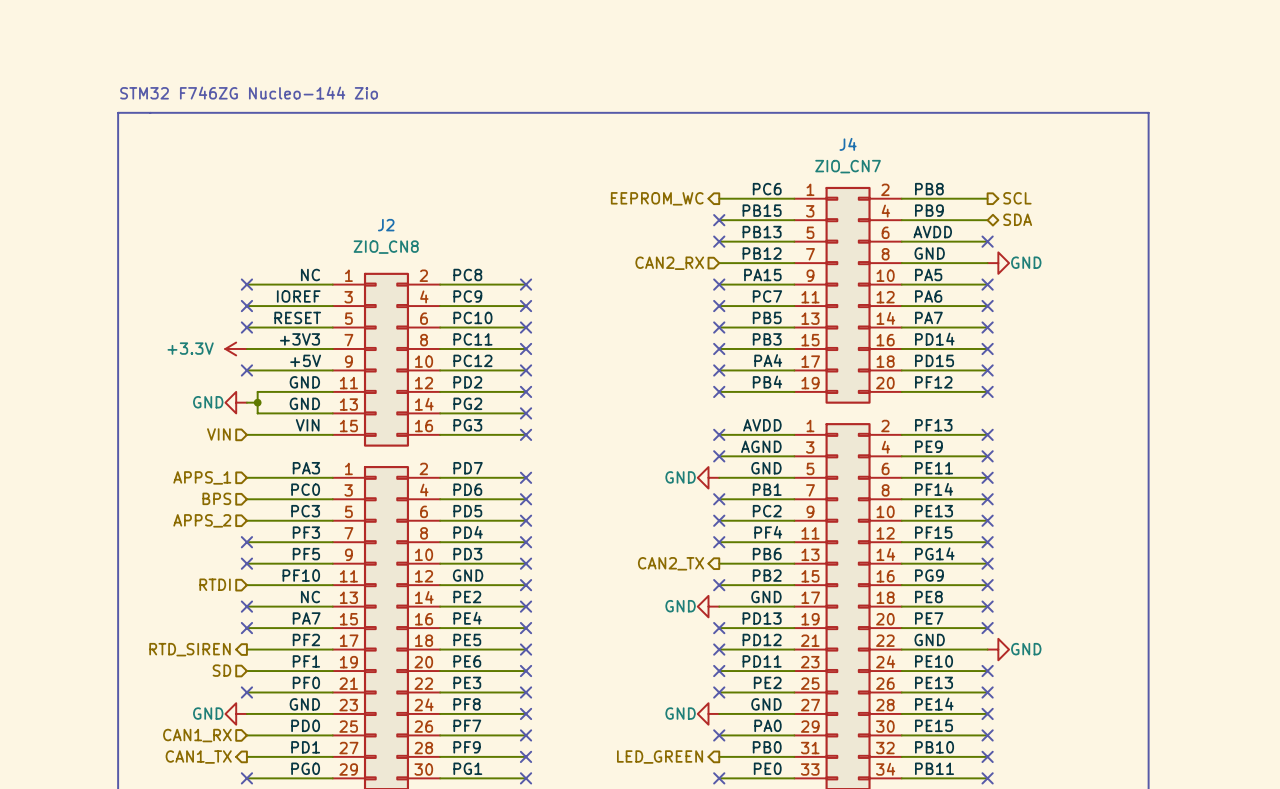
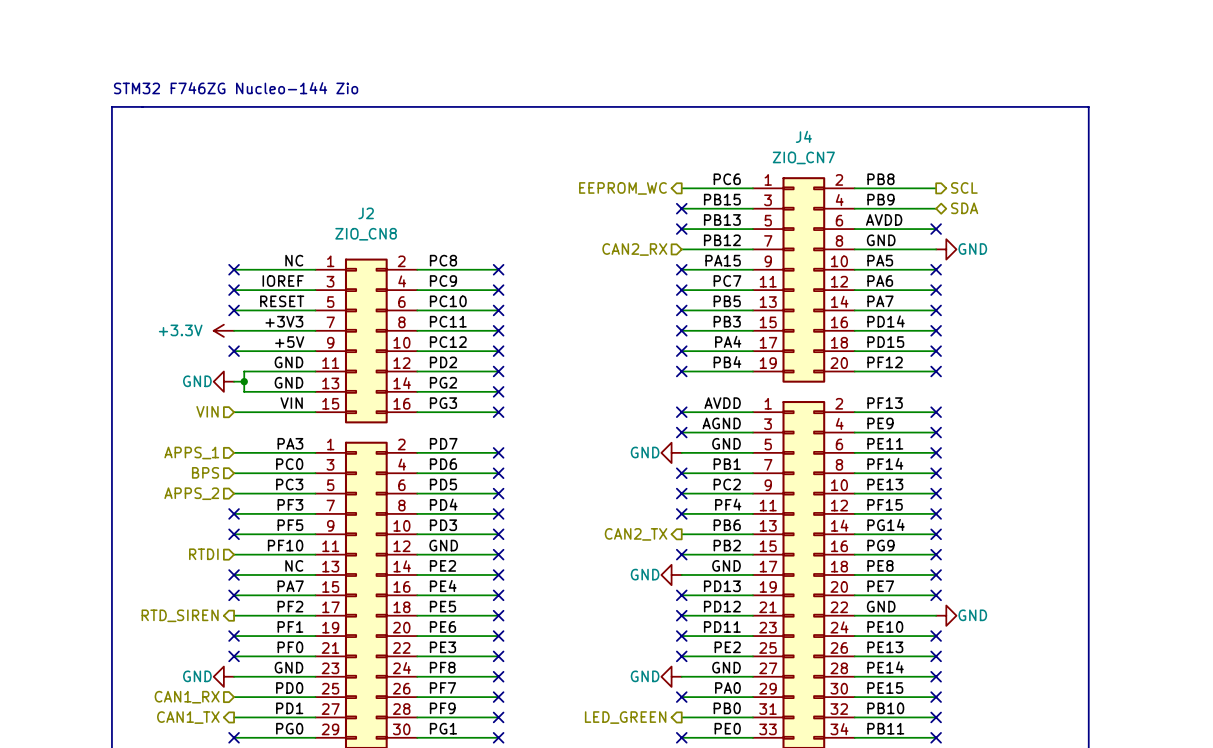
hierarchical label: SD (221, 670) -> none
no-connect mark: none -> (234, 636)

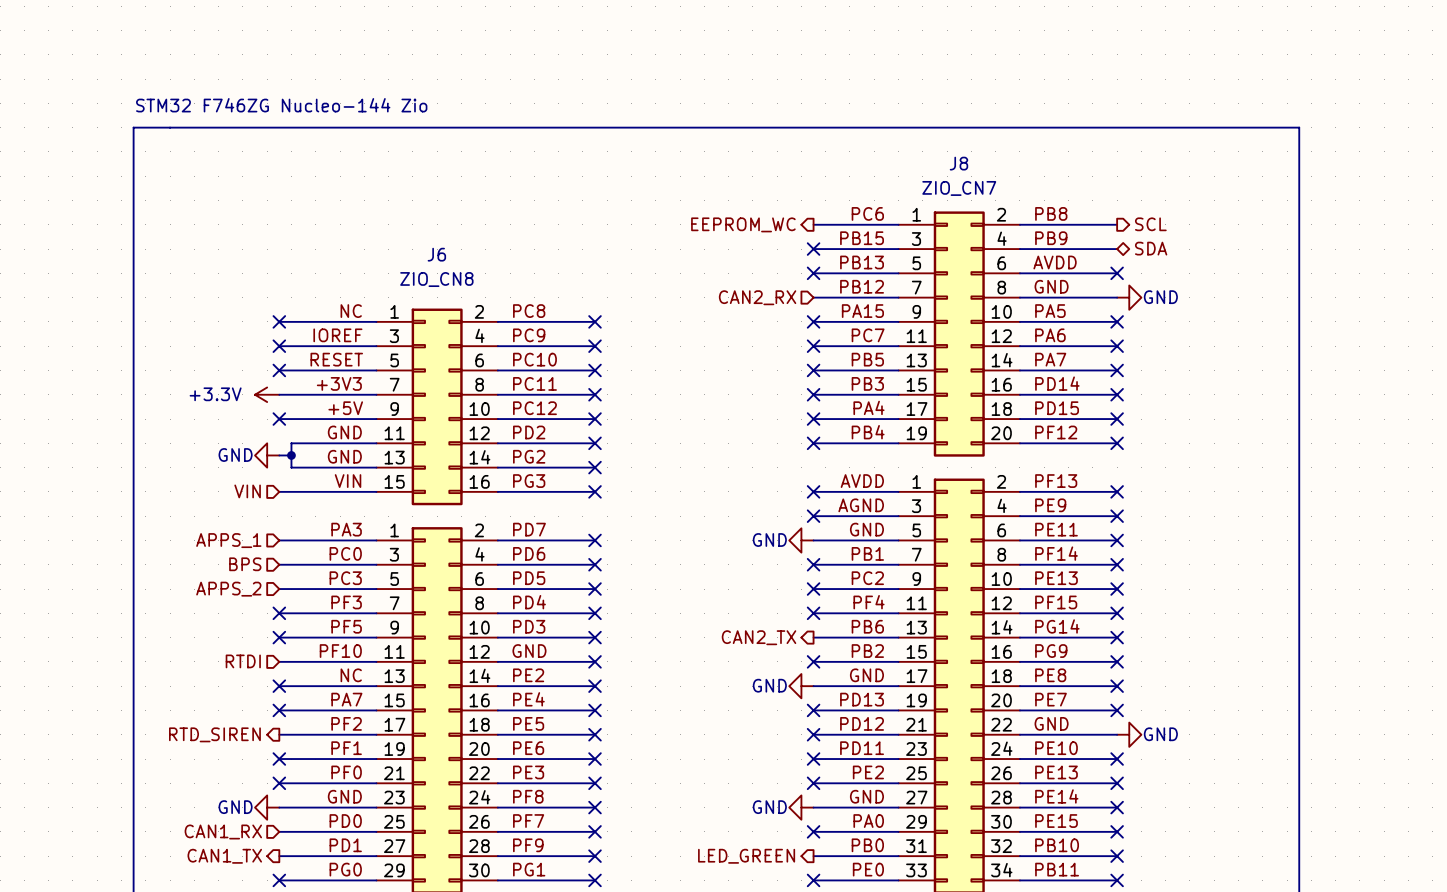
J4 name: J4 (803, 136) -> J8 (958, 163)
J2 name: J2 (366, 213) -> J6 (436, 254)

